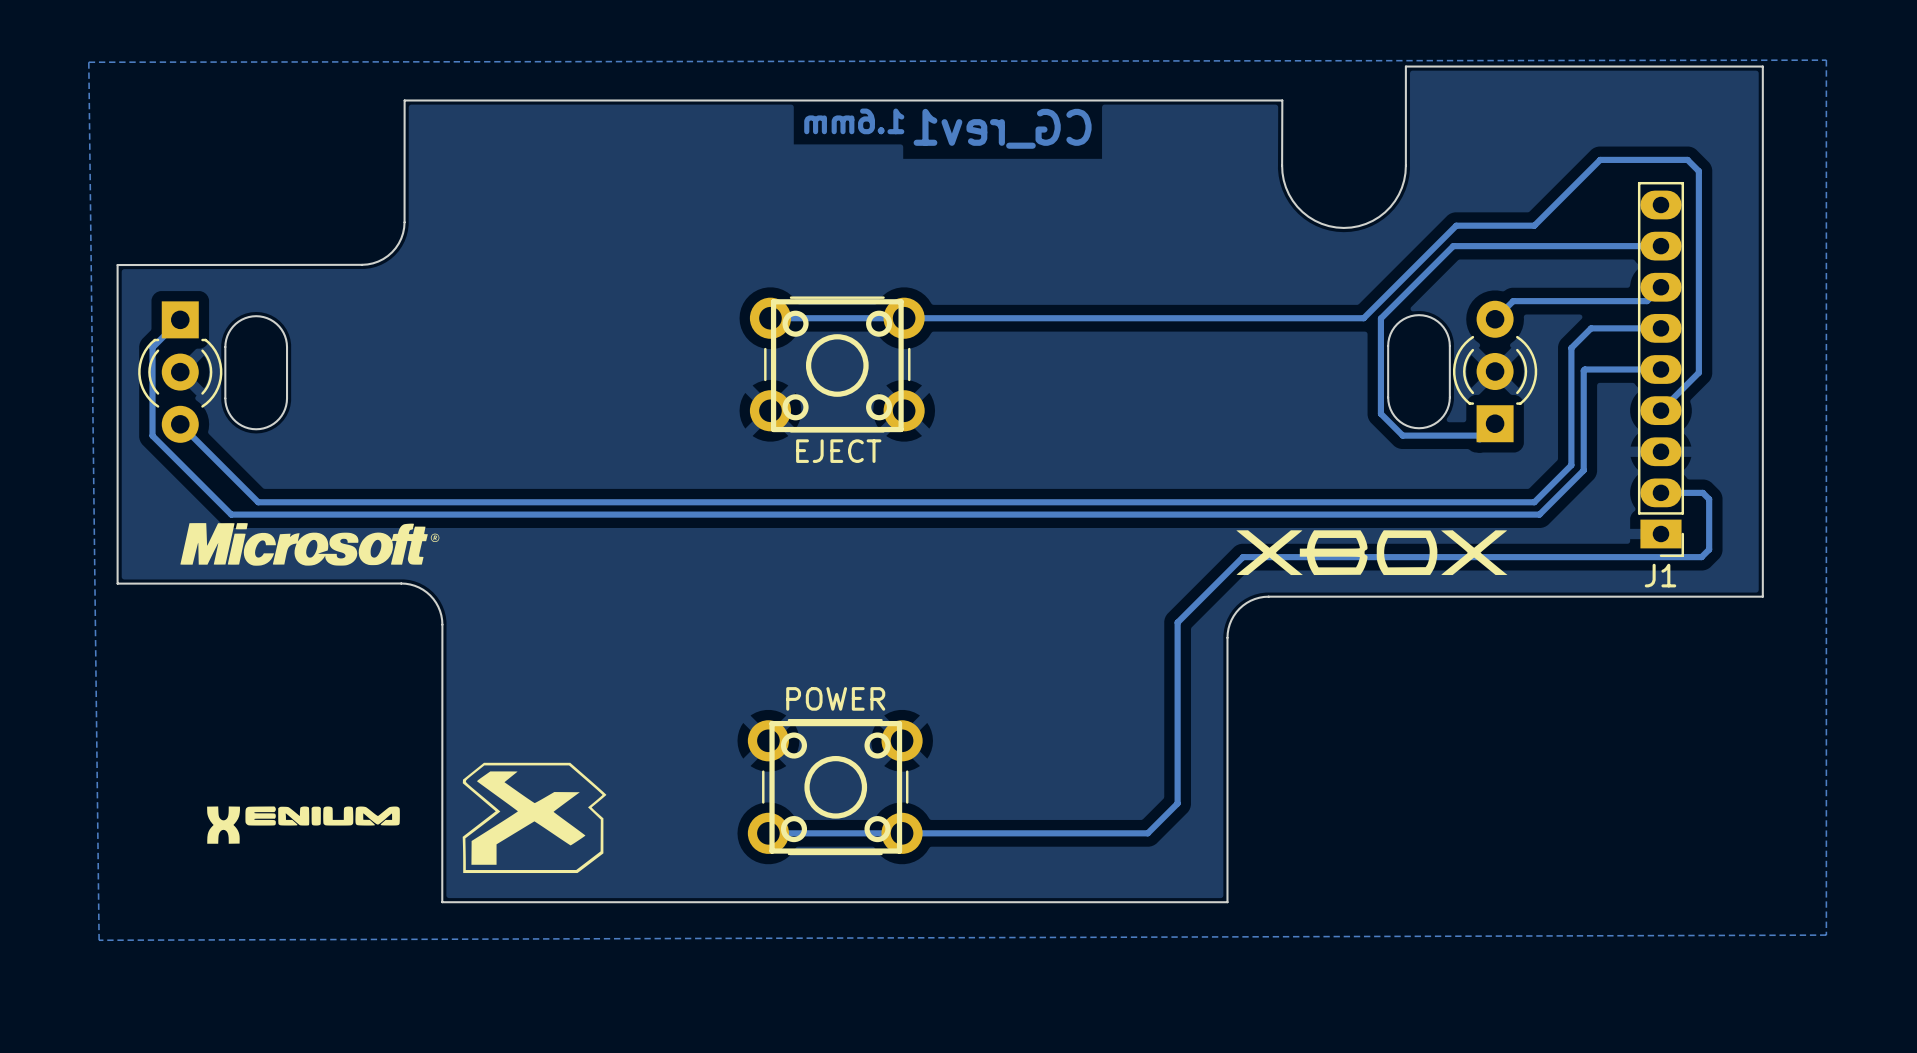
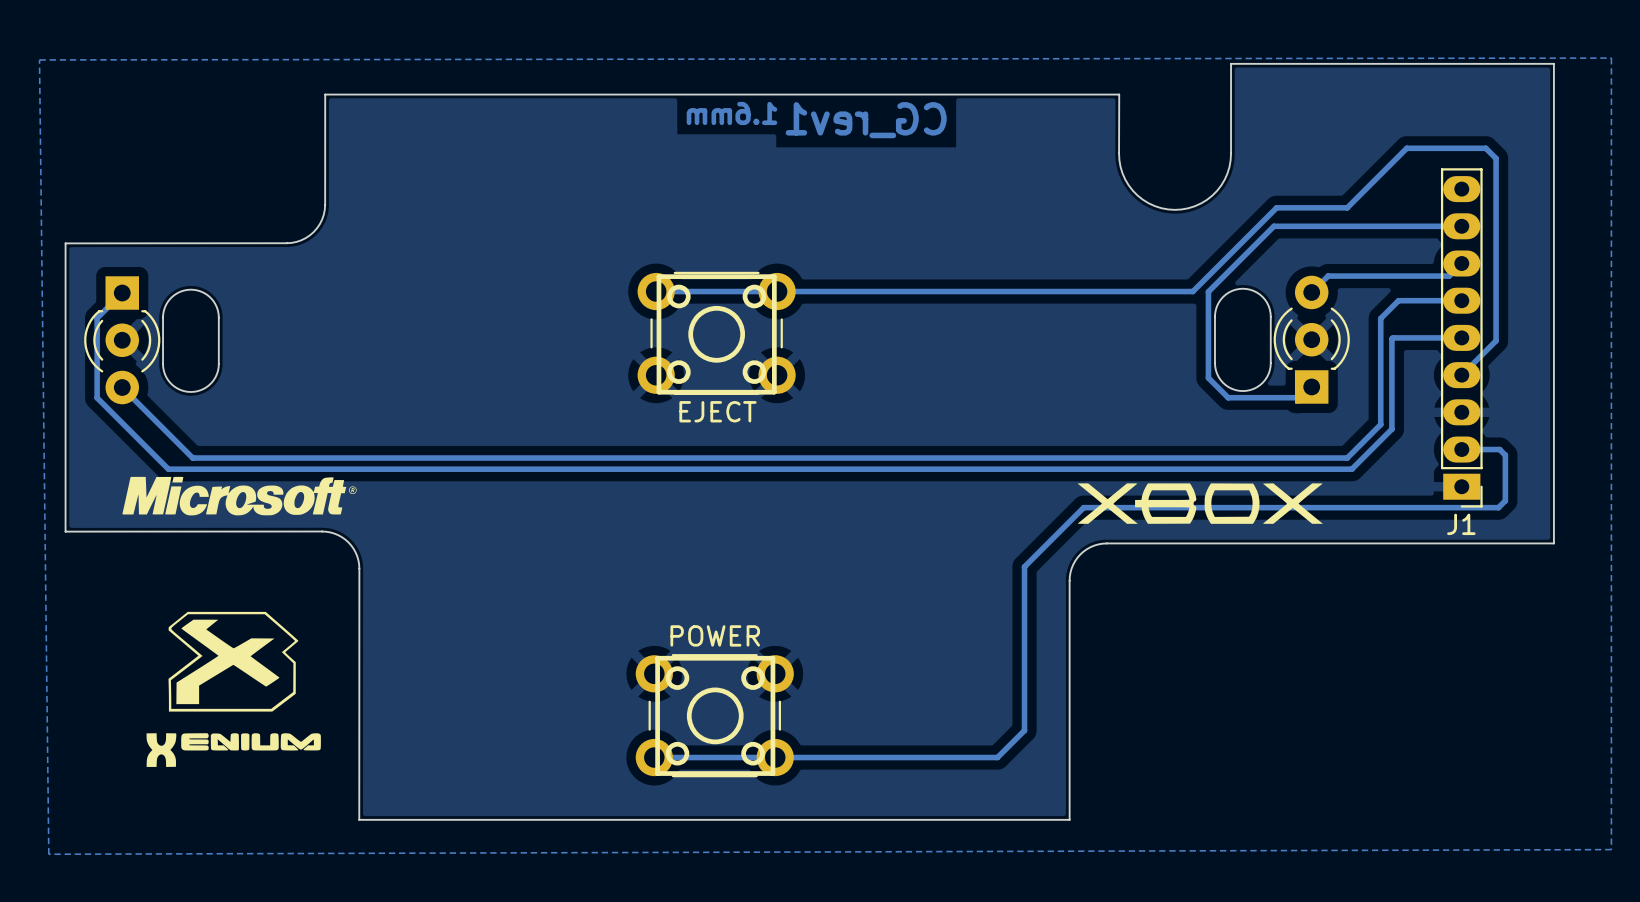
drawing position: (534, 817) -> (233, 661)

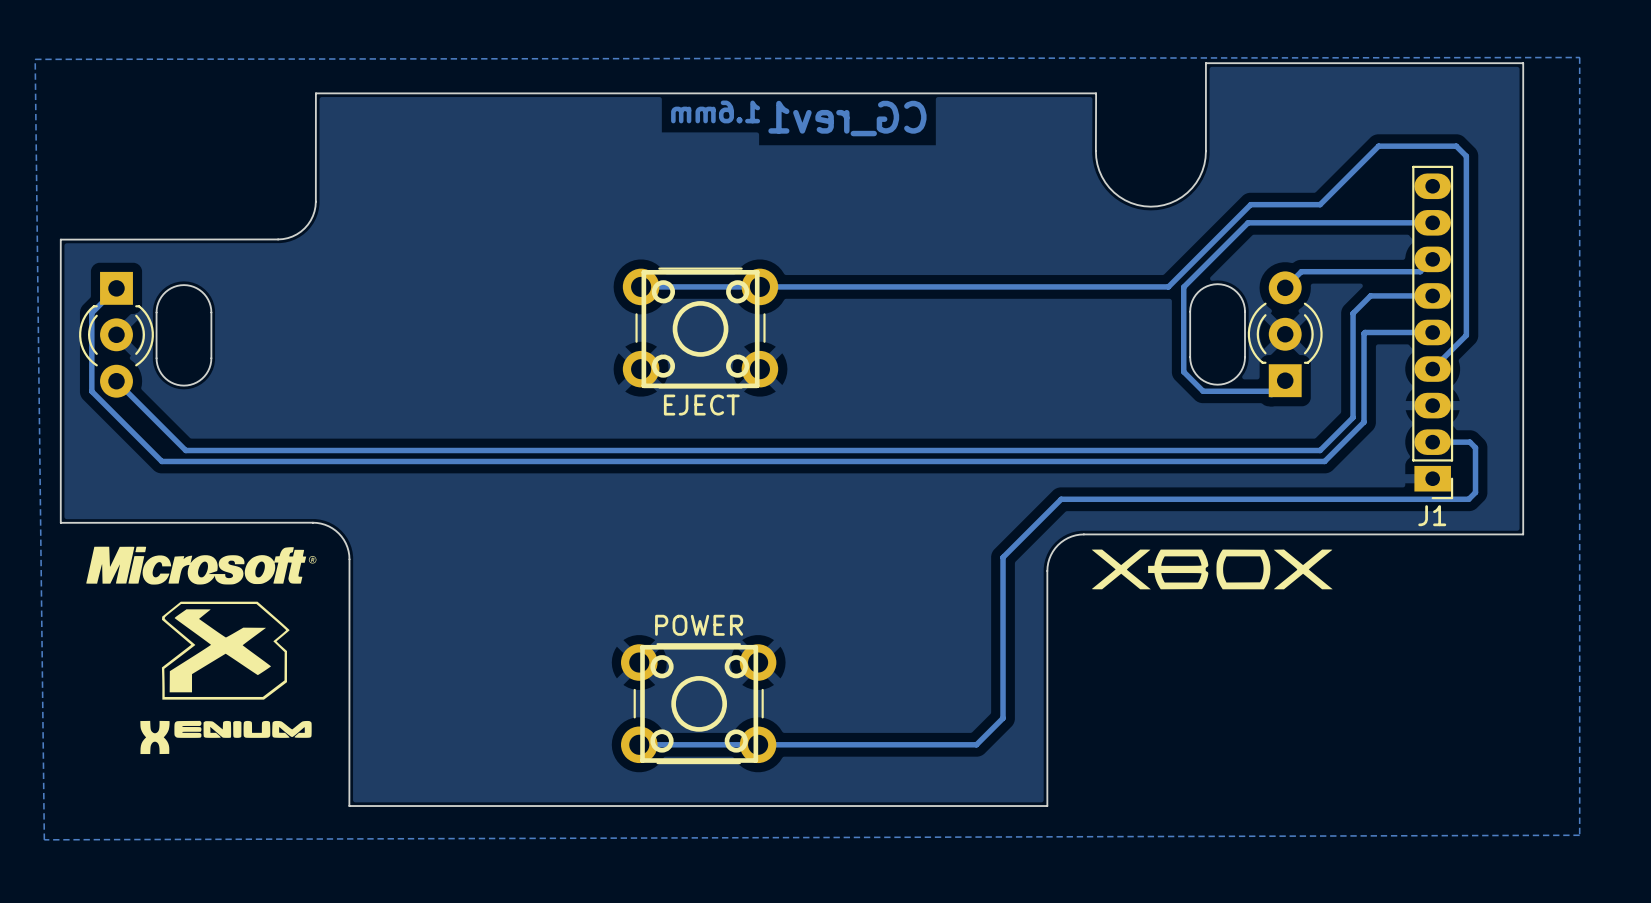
drawing position: (239, 496) -> (201, 565)
drawing position: (1200, 503) -> (1212, 569)

